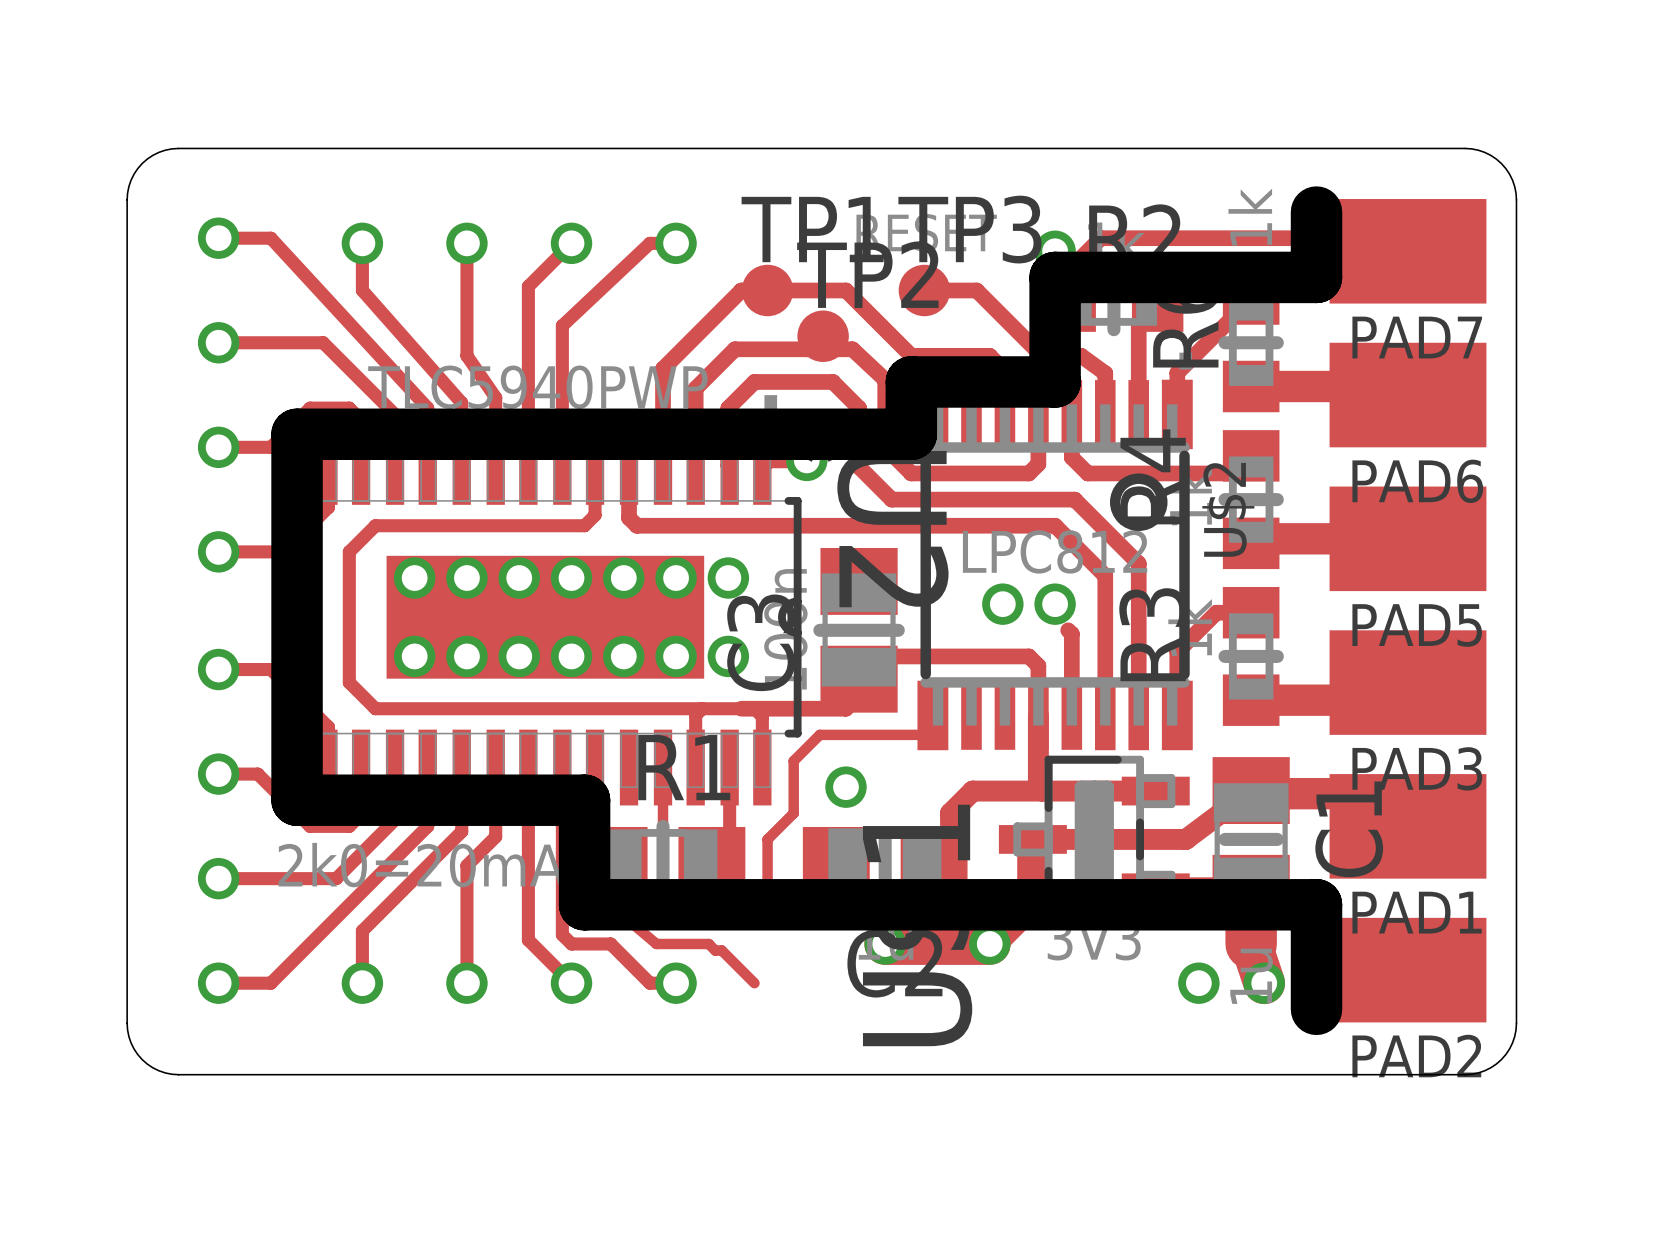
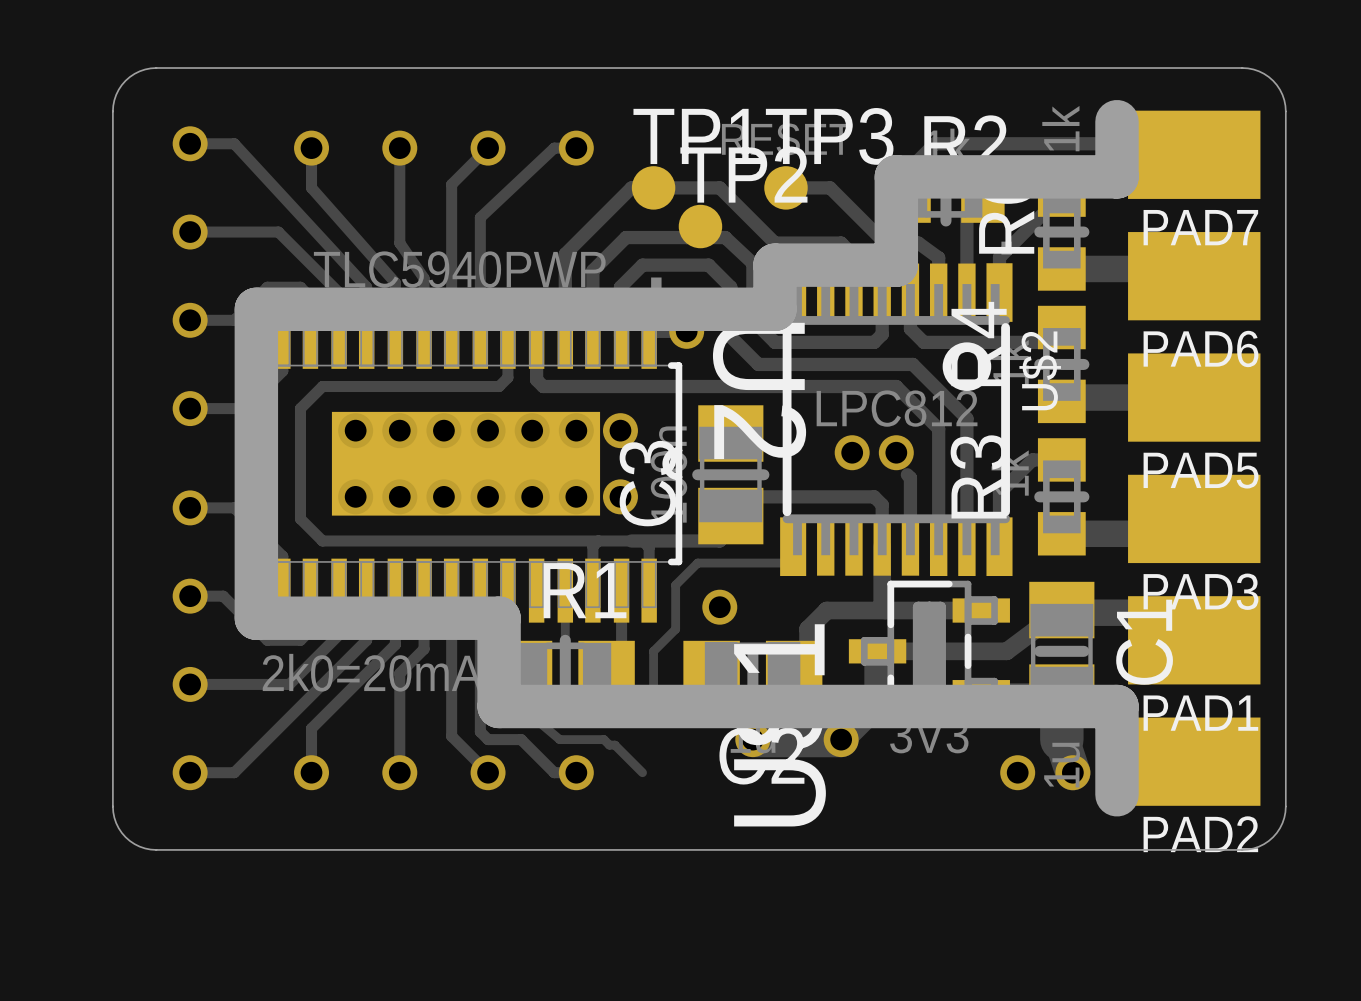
via: (1055, 251) -> none

